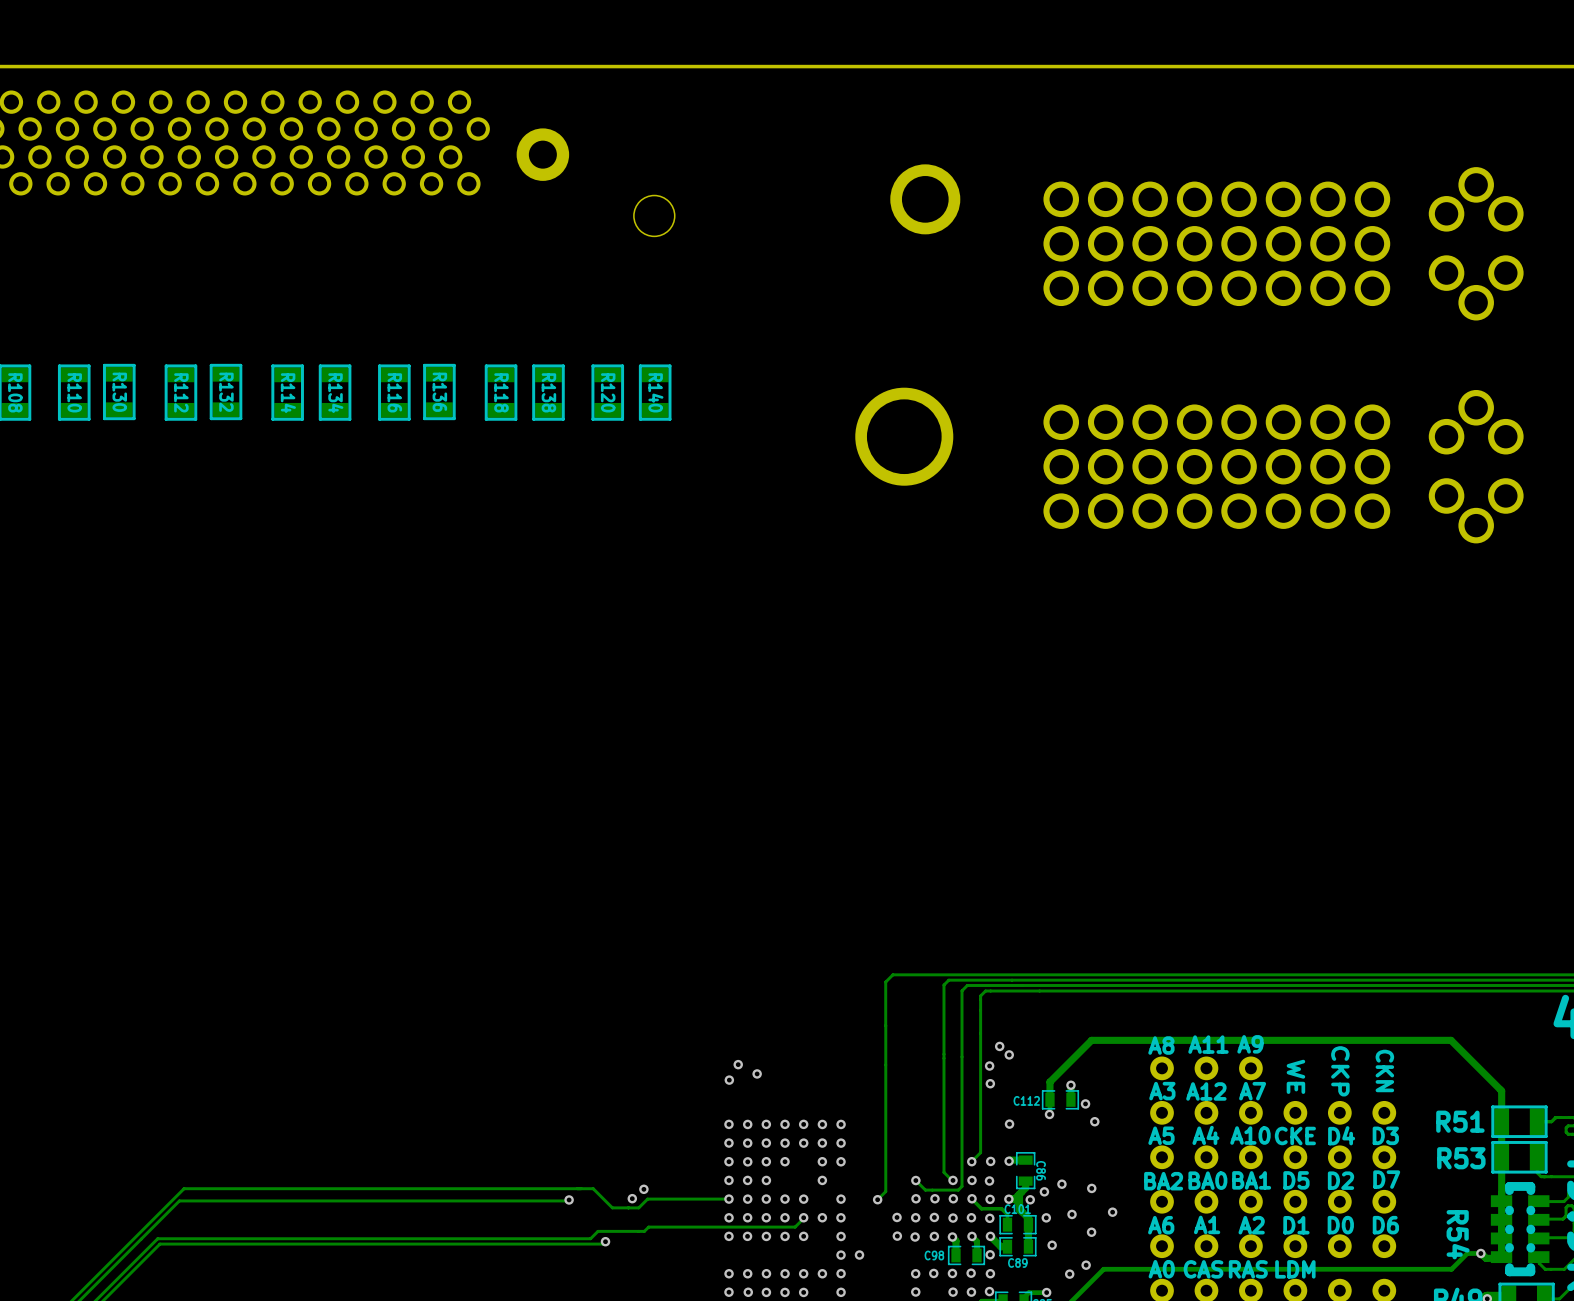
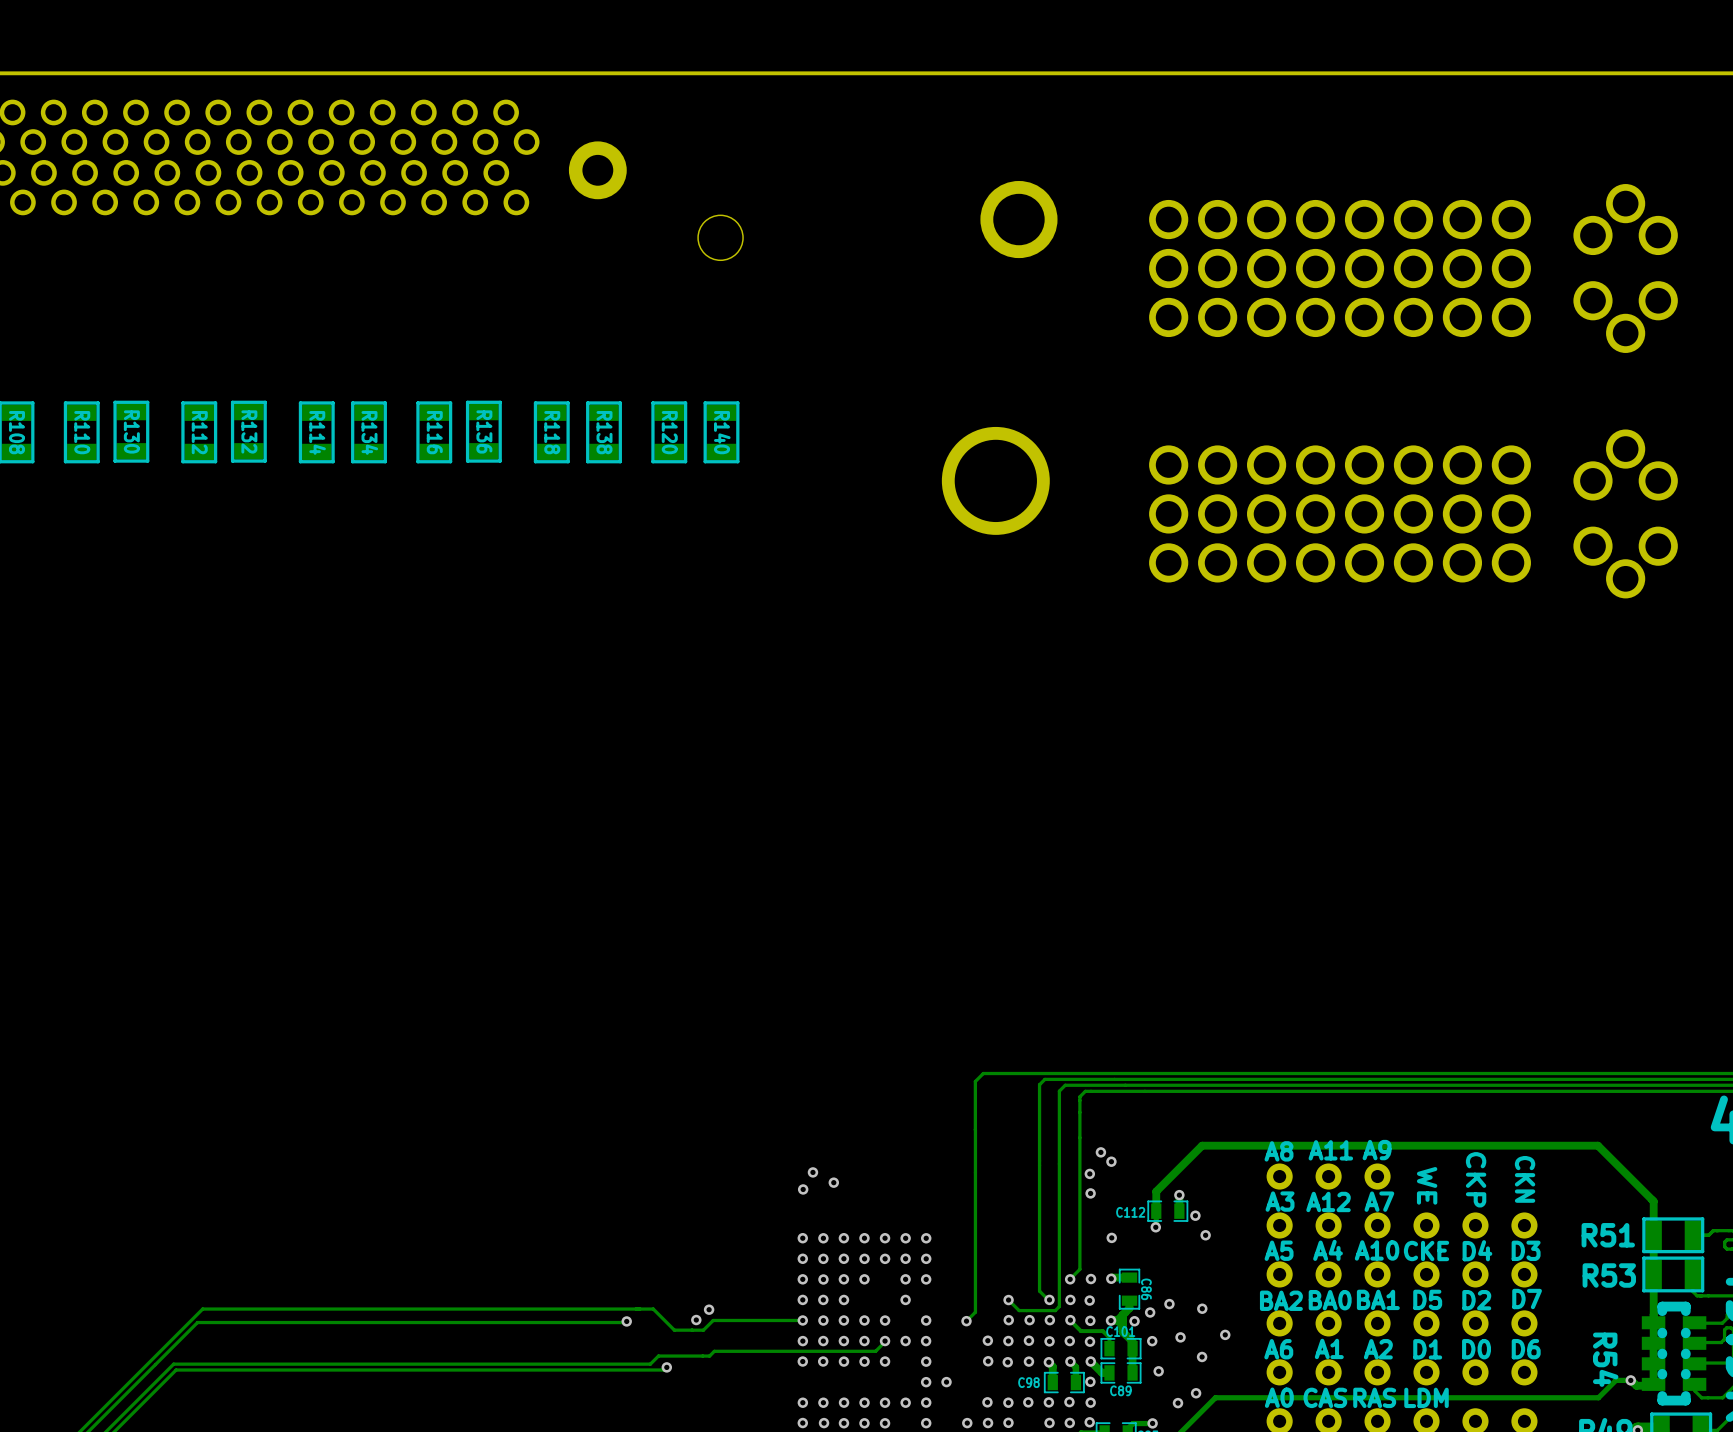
via: none -> (987, 1402)
via: none -> (967, 1423)
via: none -> (988, 1423)

